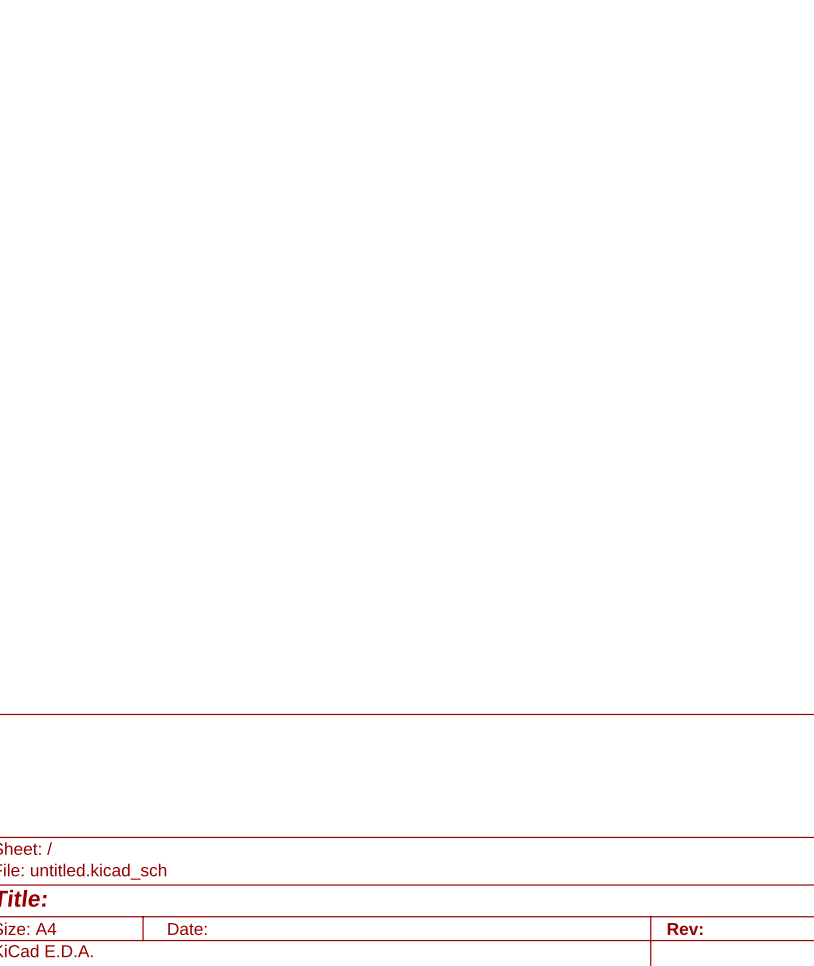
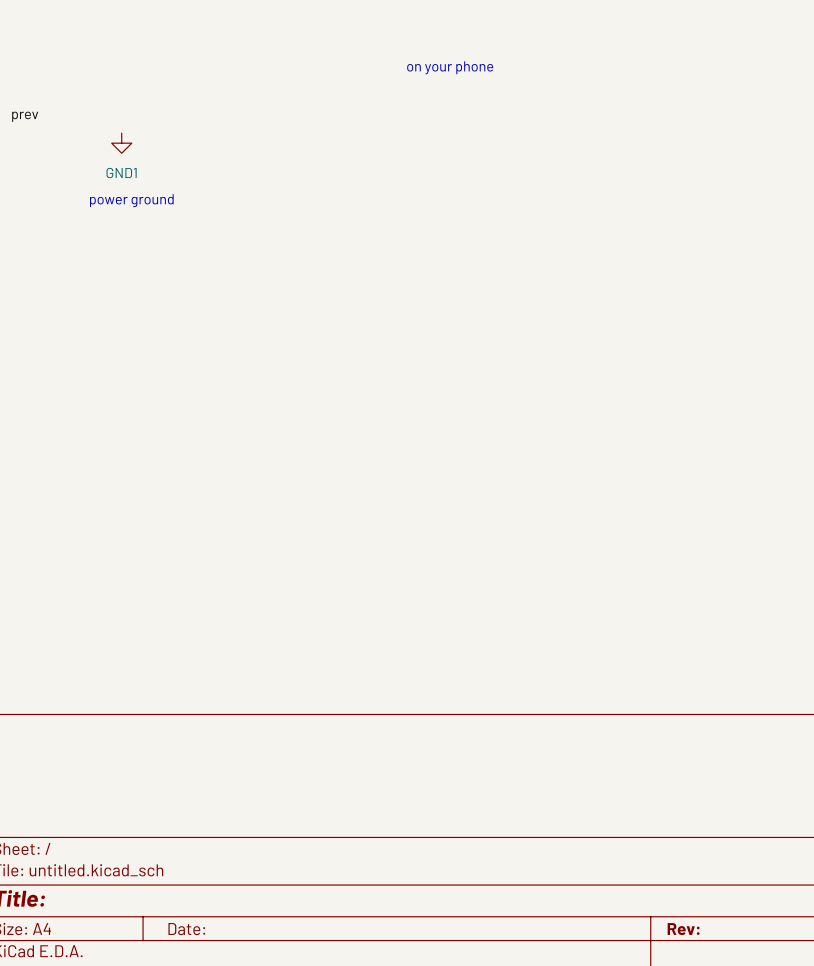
text: none -> on your phone (450, 67)
label: none -> prev (25, 116)
power symbol: none -> GND1 (121, 143)
text: none -> power ground (131, 200)

